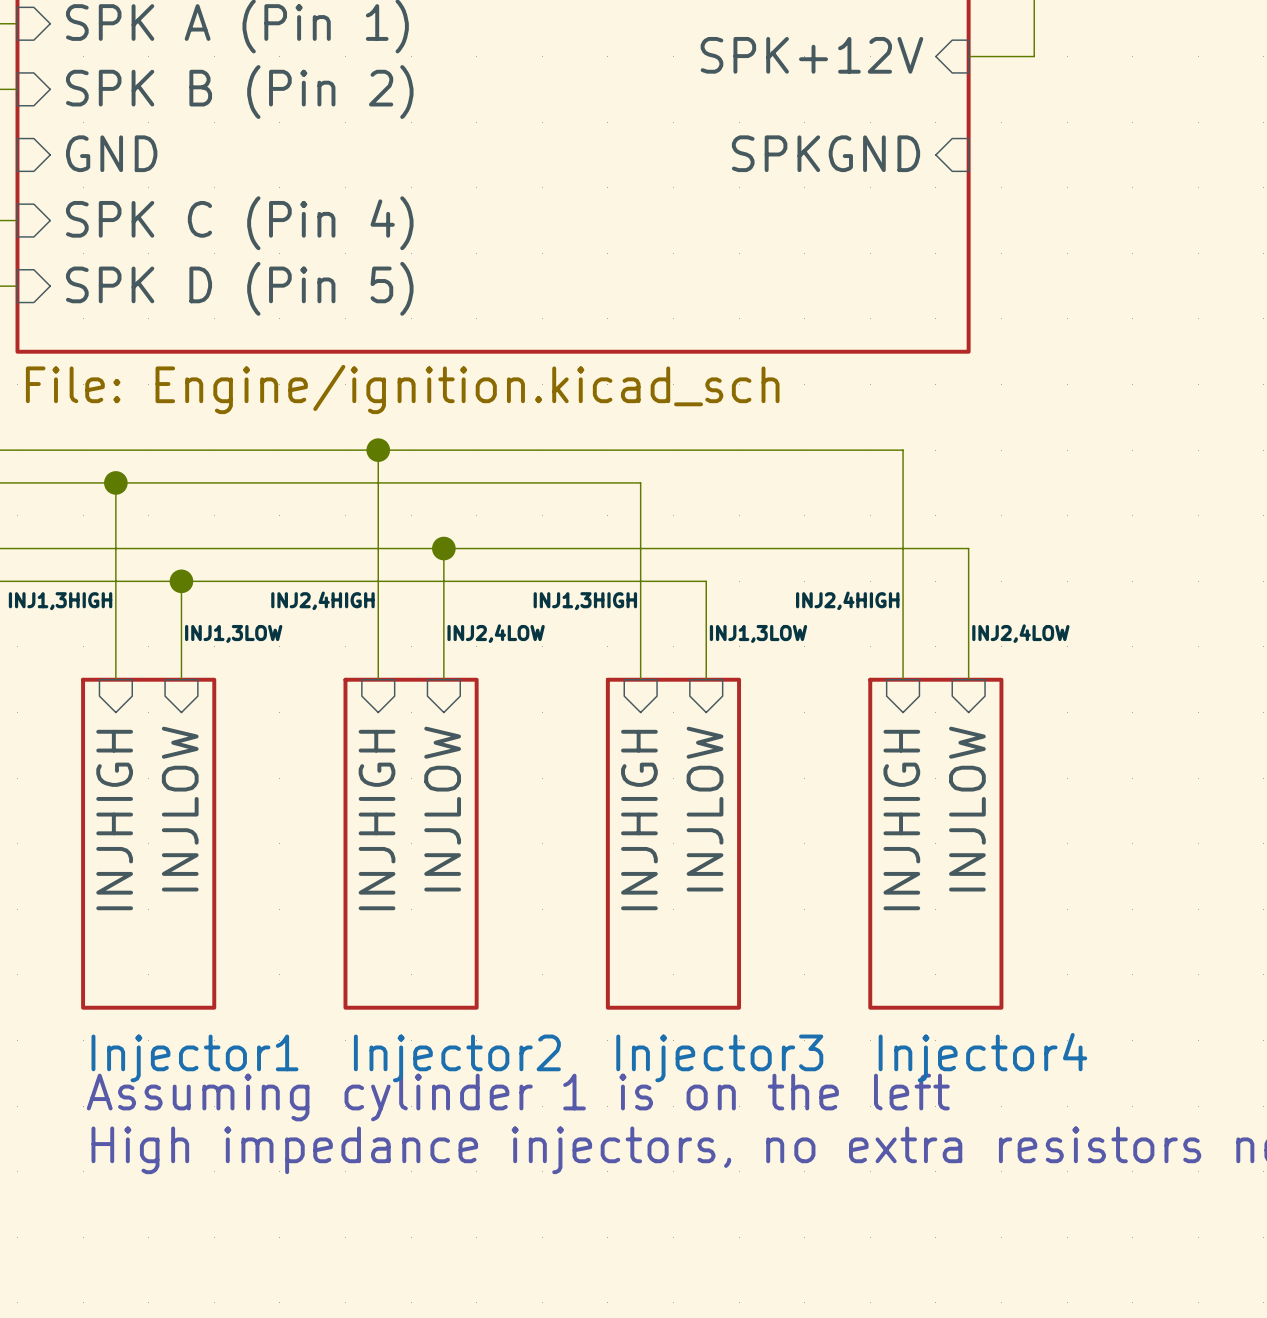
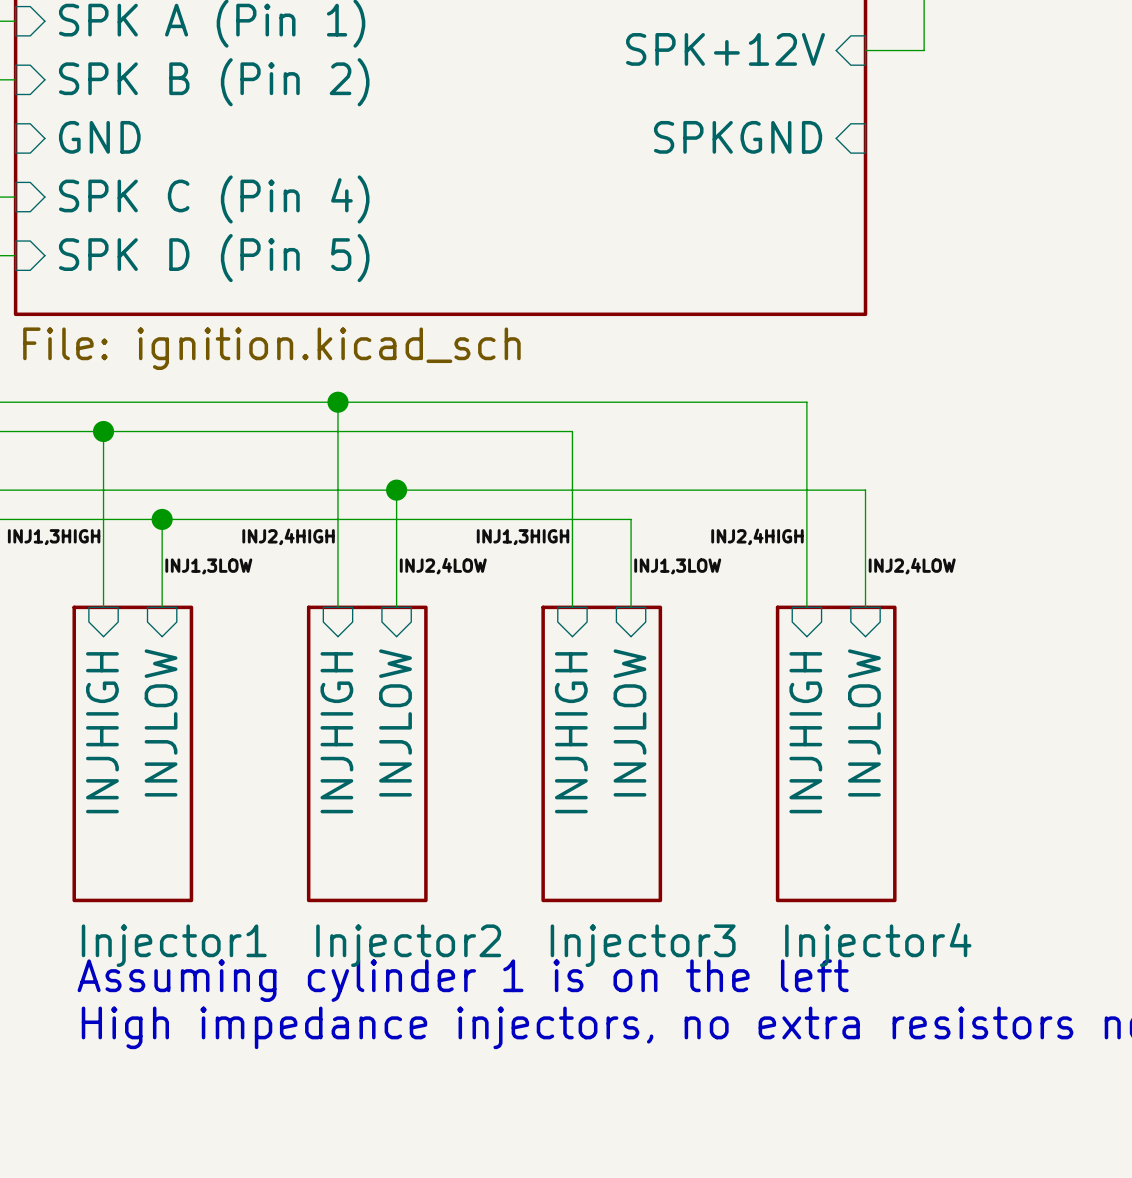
sheet value: File: Engine/ignition.kicad_sch (402, 389) -> File: ignition.kicad_sch (271, 348)

